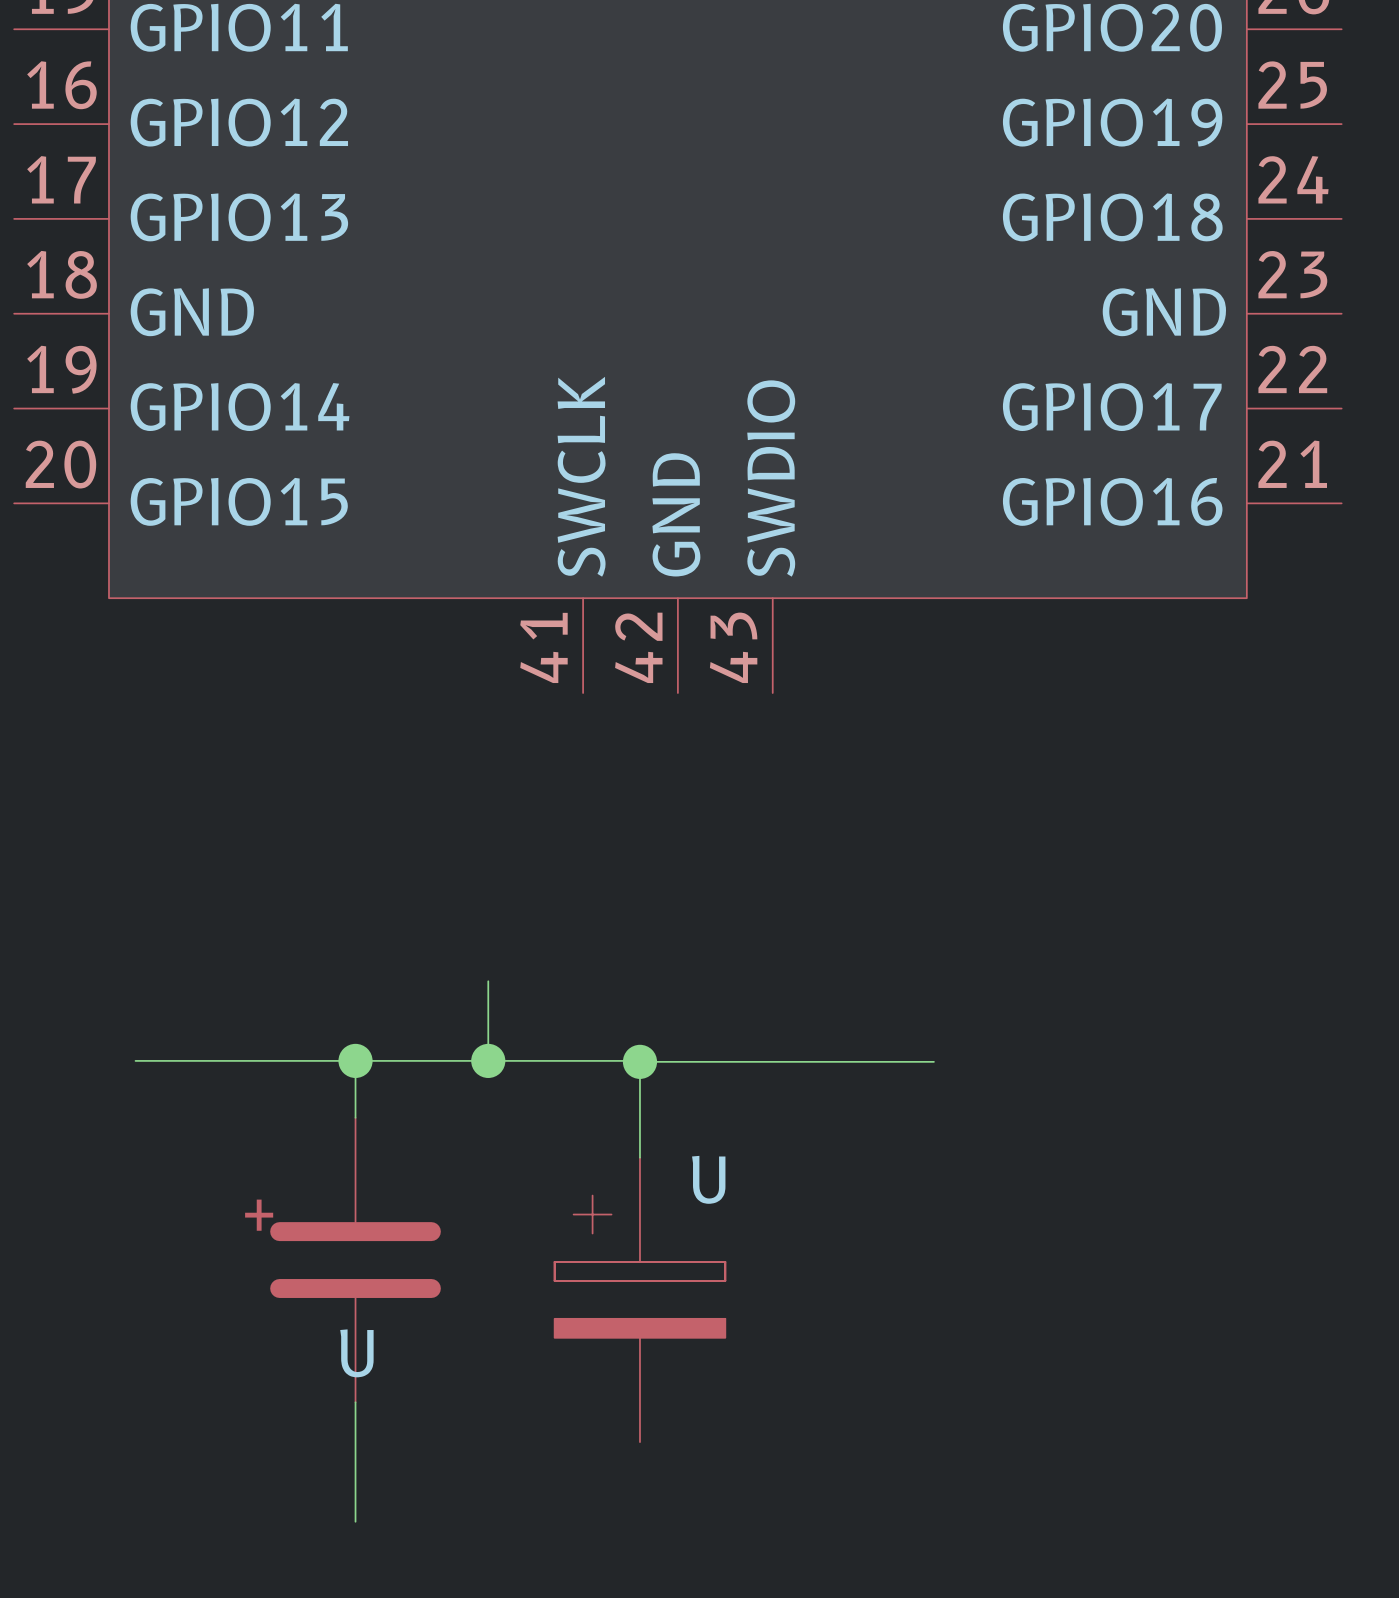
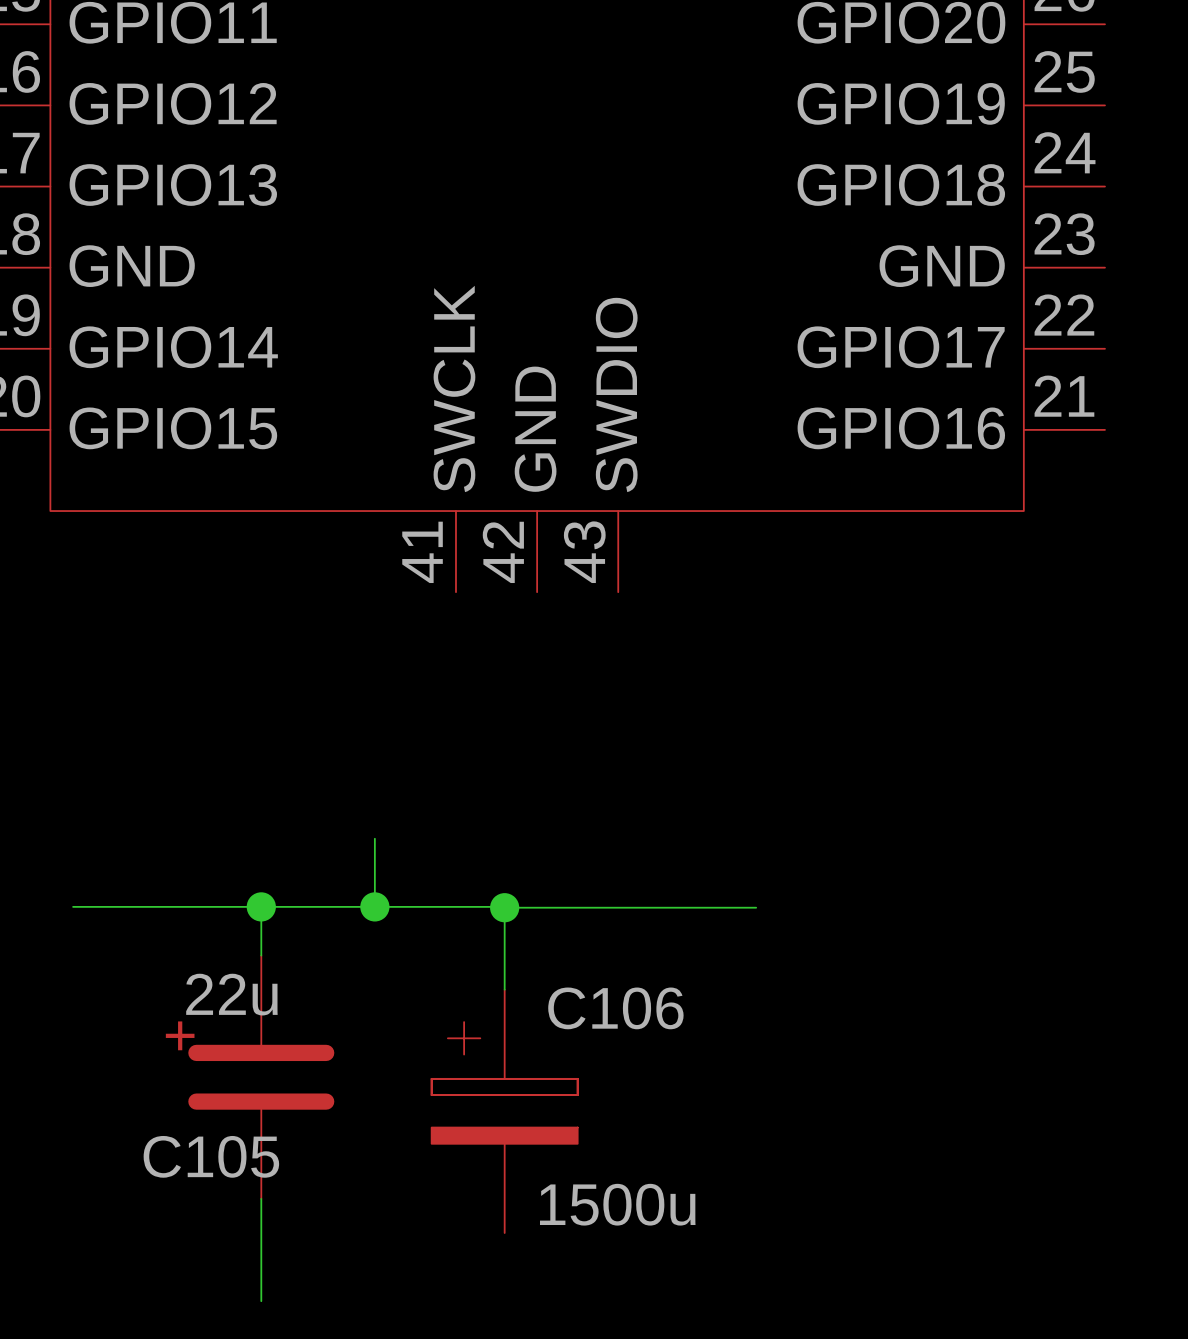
U value: none -> 22u (231, 994)
U name: U (708, 1179) -> C106 (615, 1008)
U name: U (356, 1353) -> C105 (211, 1156)
U value: none -> 1500u (617, 1204)

